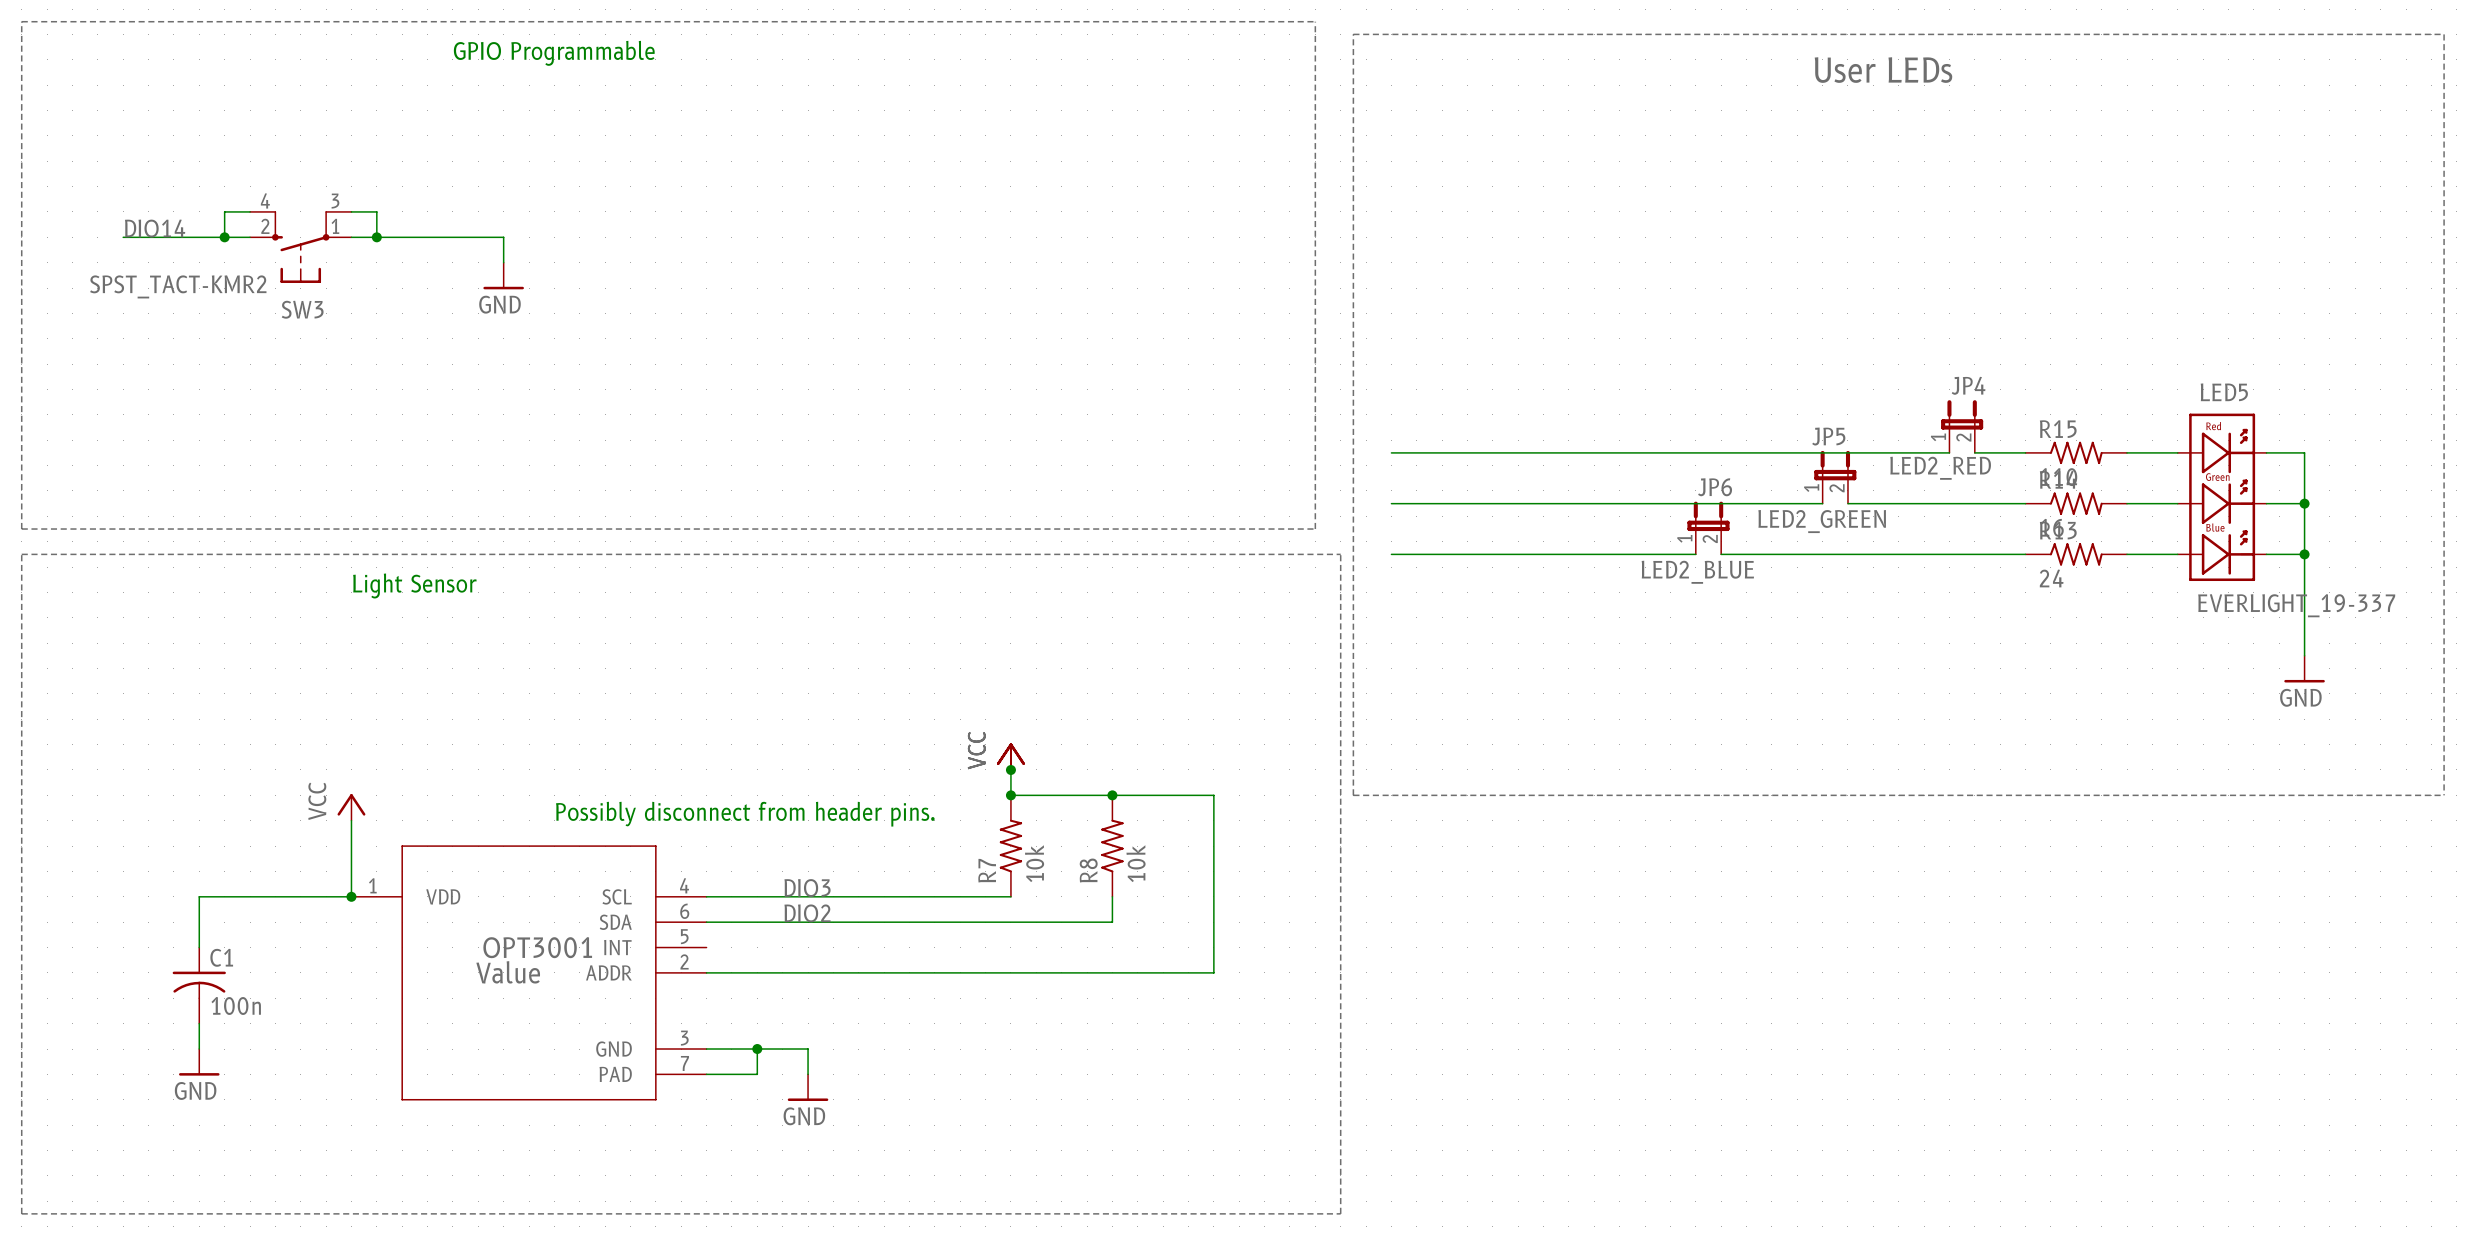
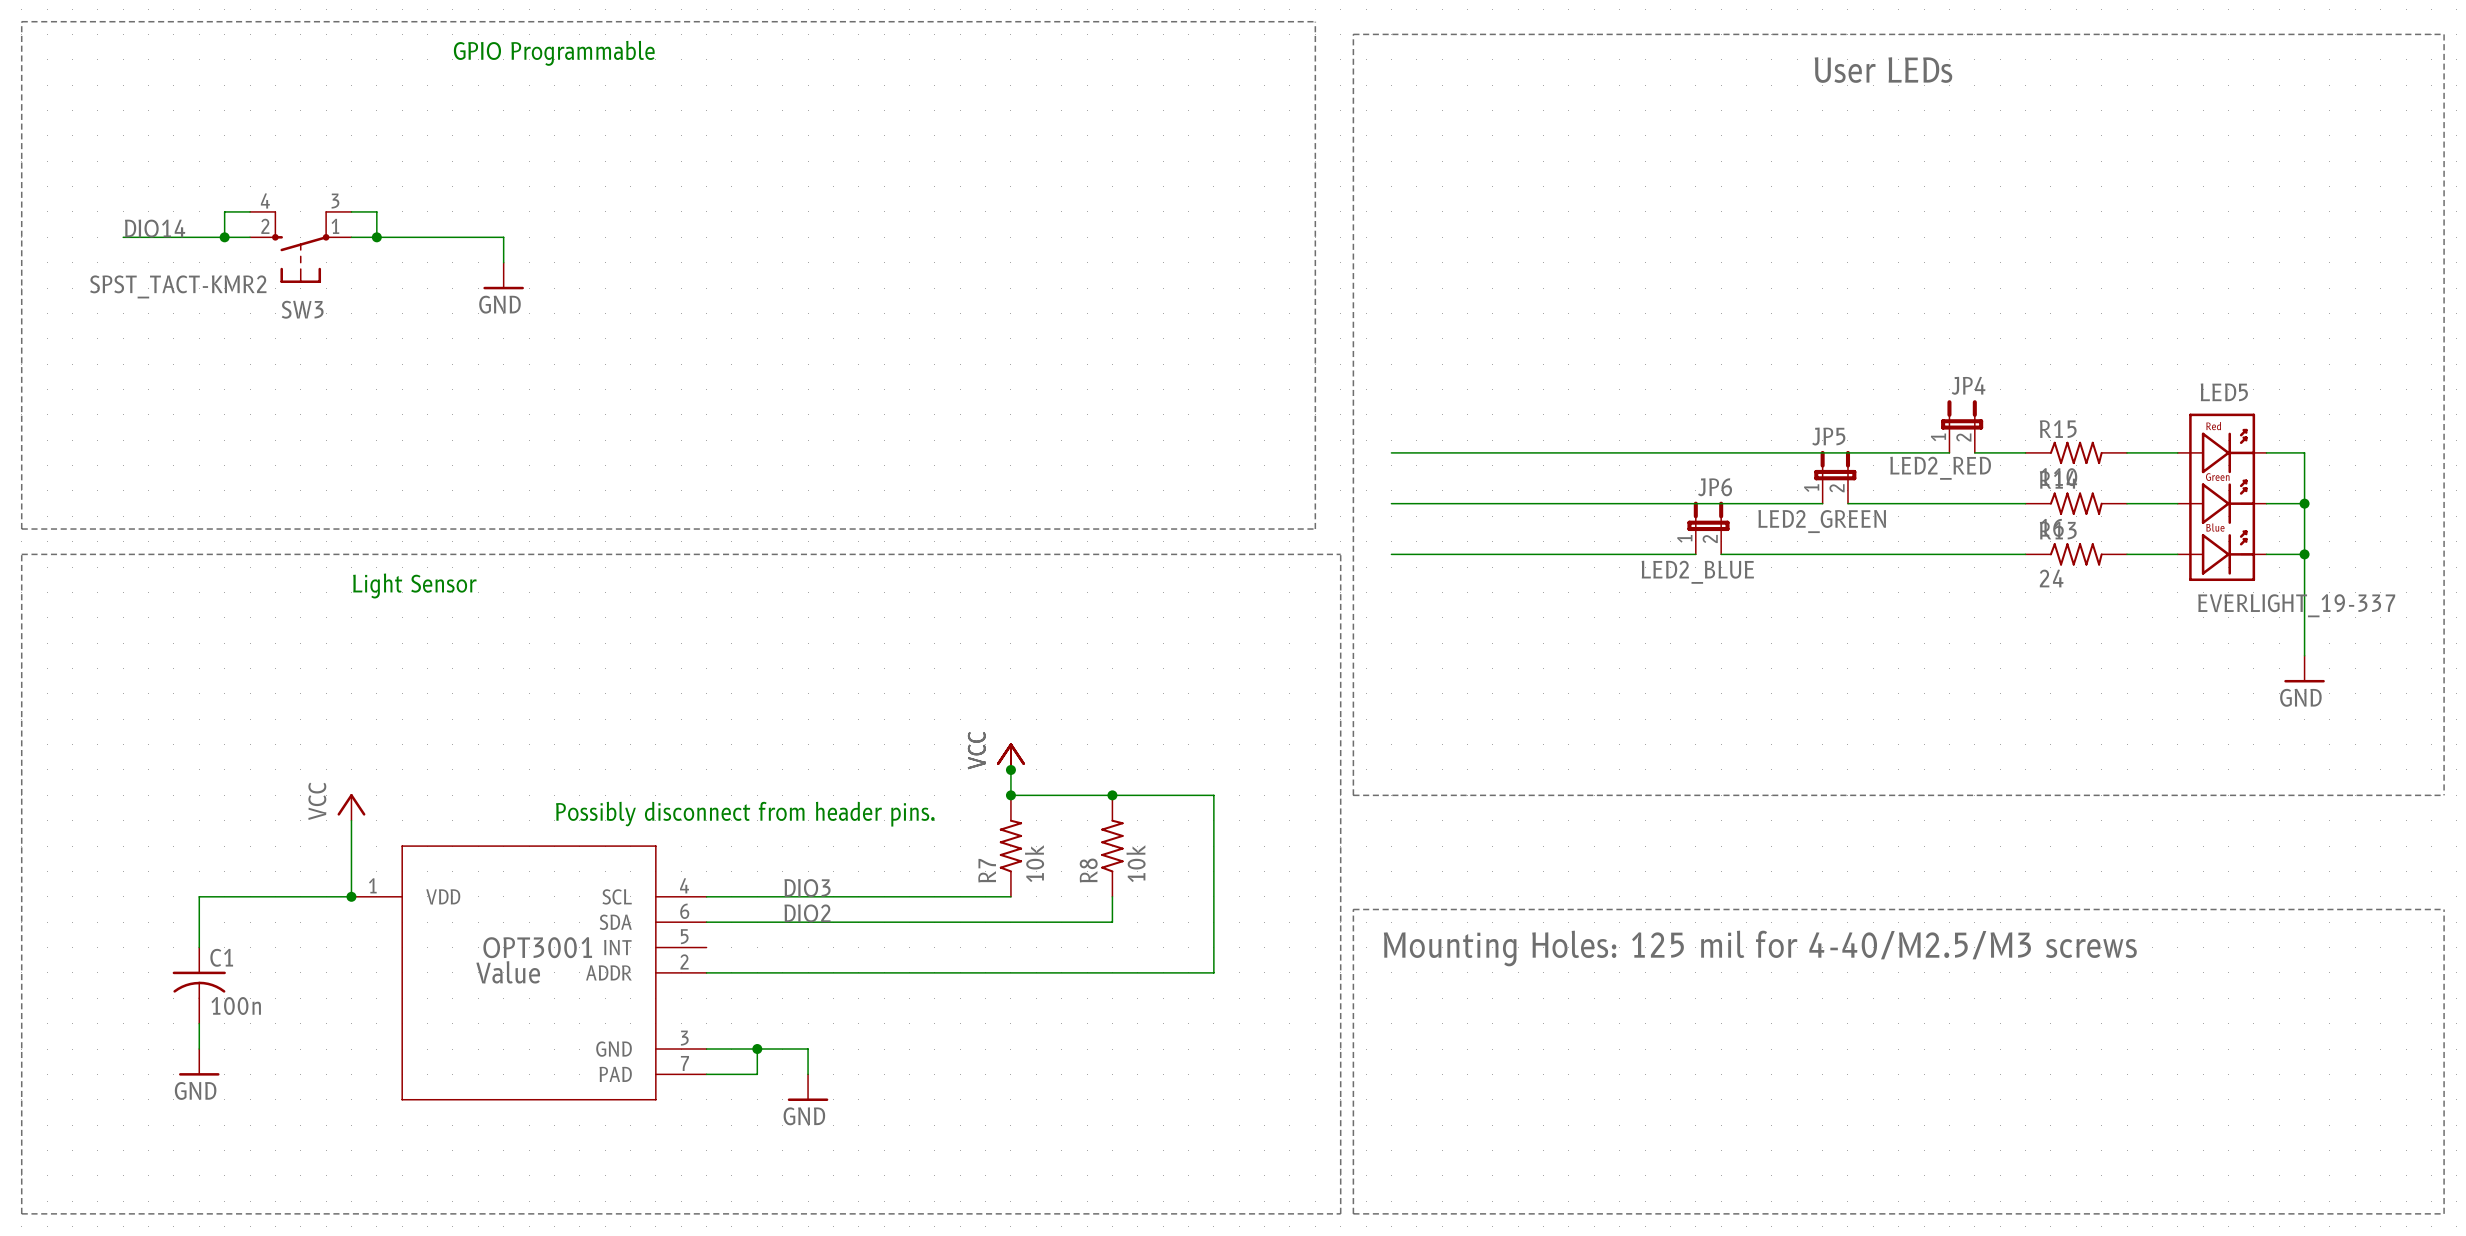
line: none -> (1353, 909) (2444, 909) (2444, 1213) (1353, 1213) (1353, 909)
text: none -> Mounting Holes: 125 mil for 4-40/M2.5/M3 screws (1760, 948)

